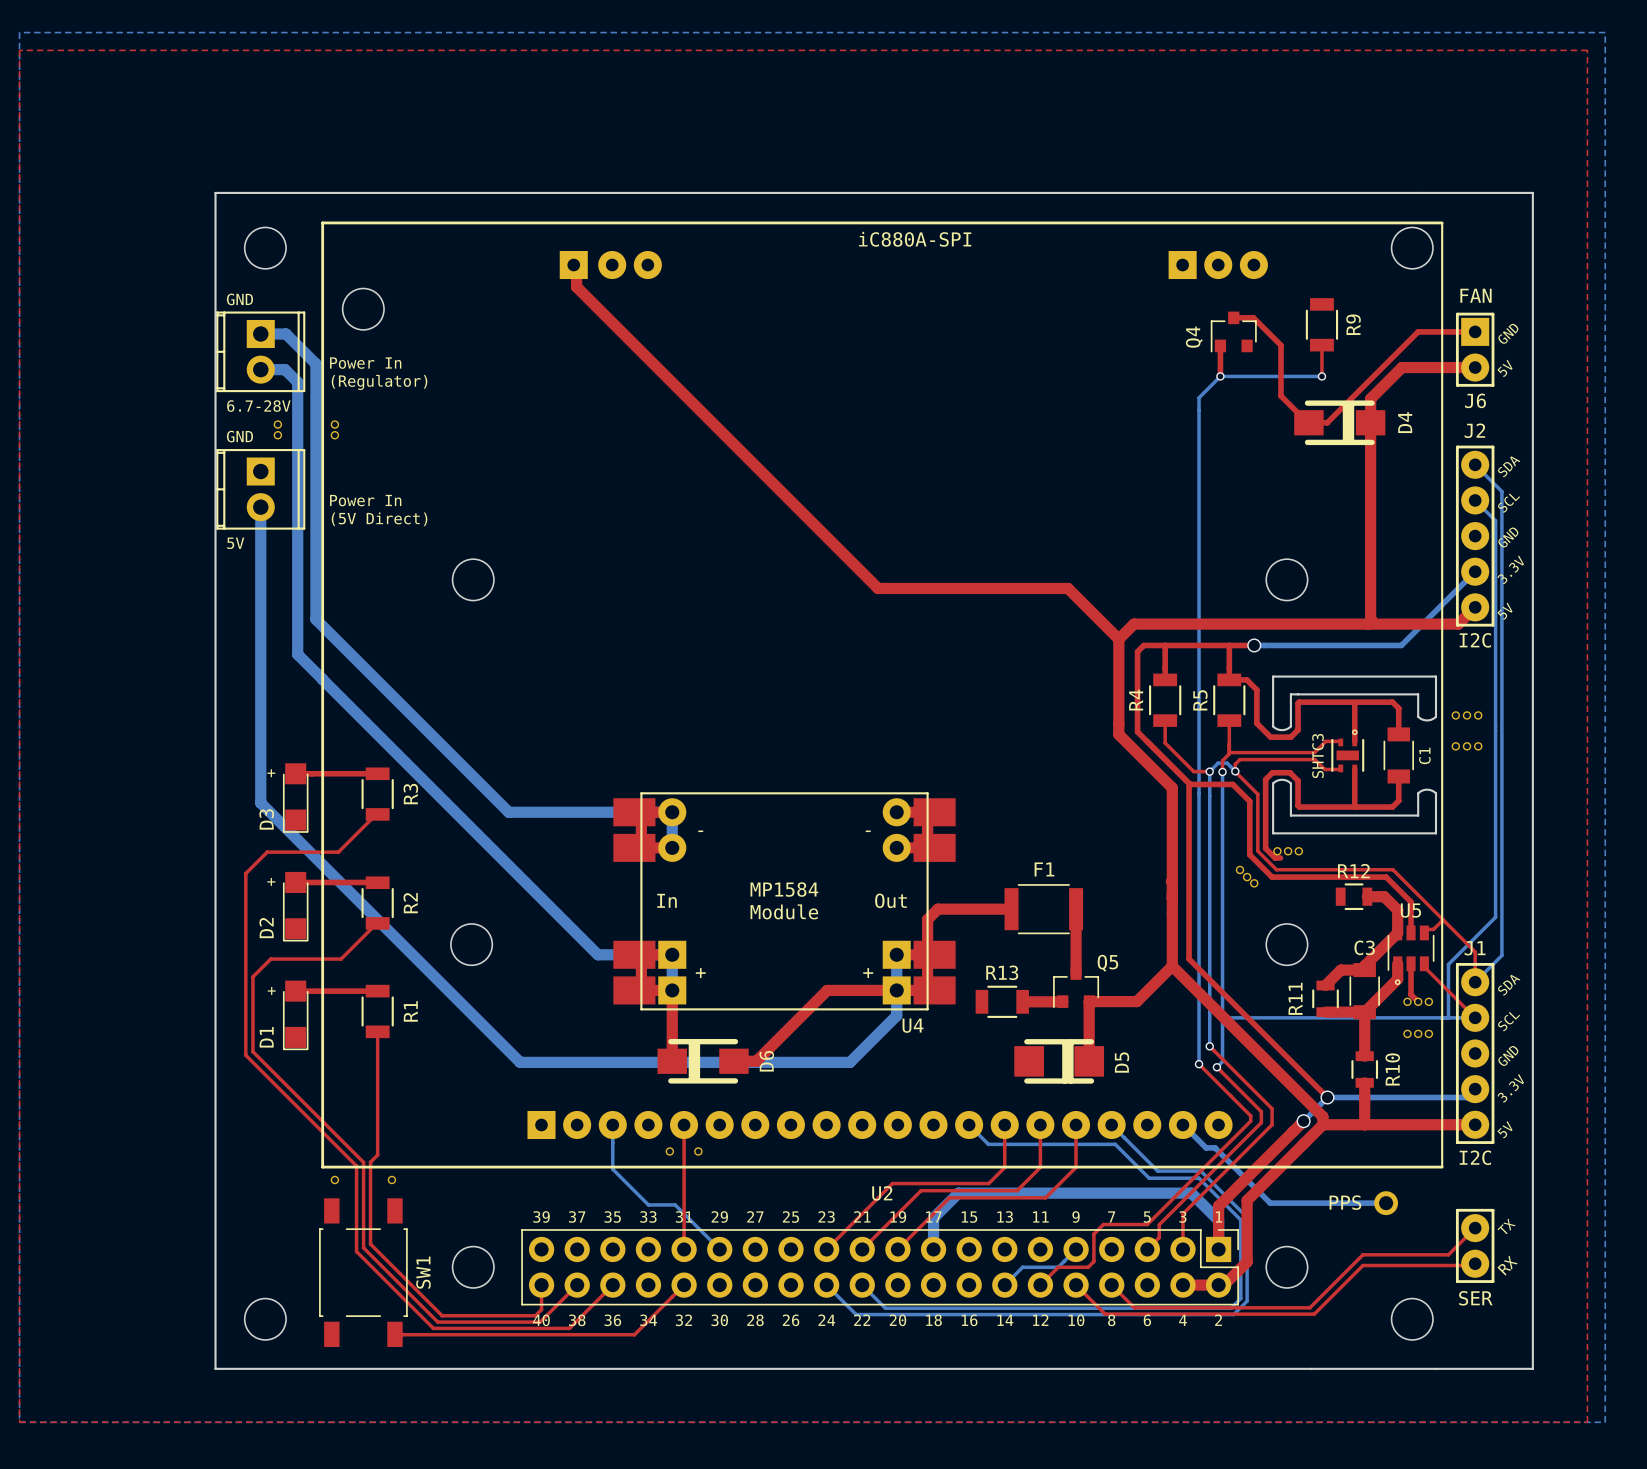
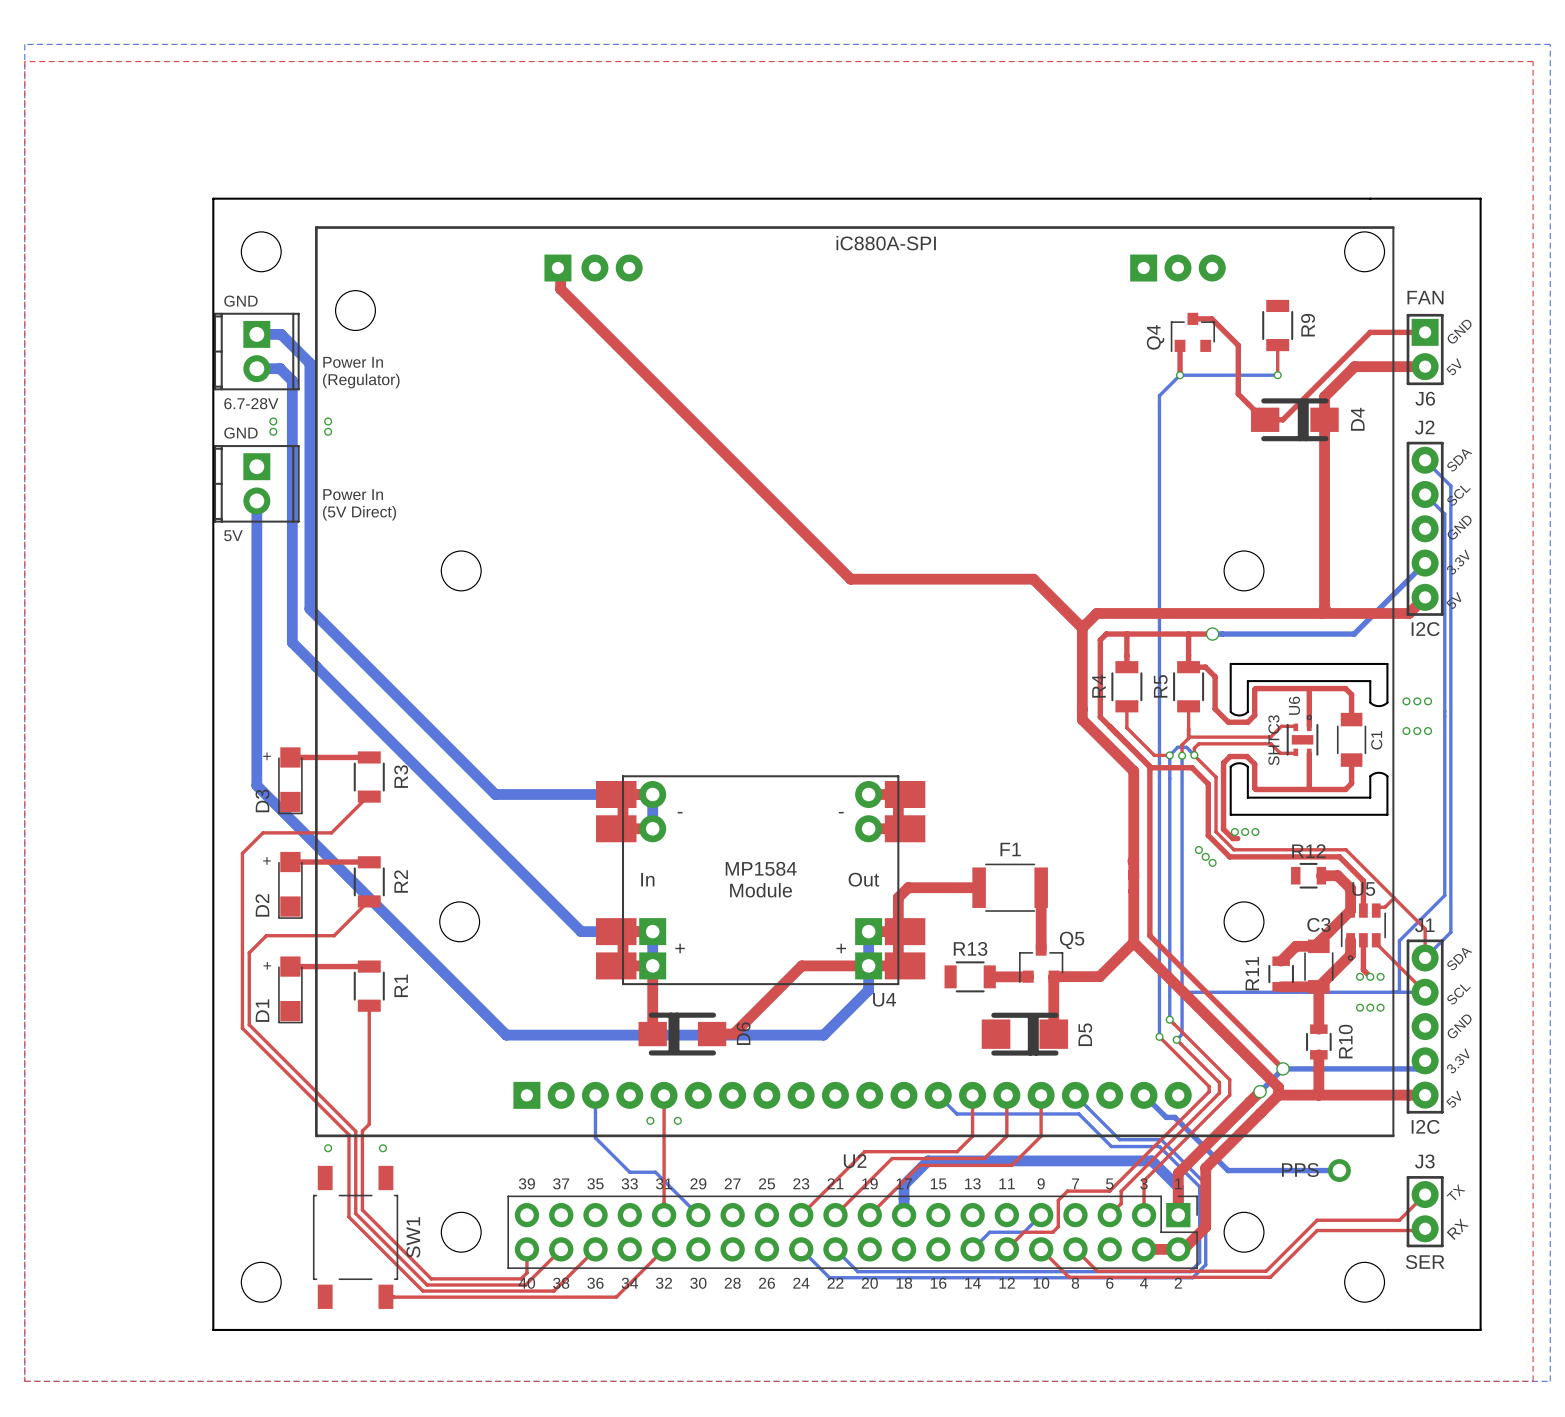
U6 name: none -> U6 (1294, 705)
J3 name: none -> J3 (1424, 1161)

